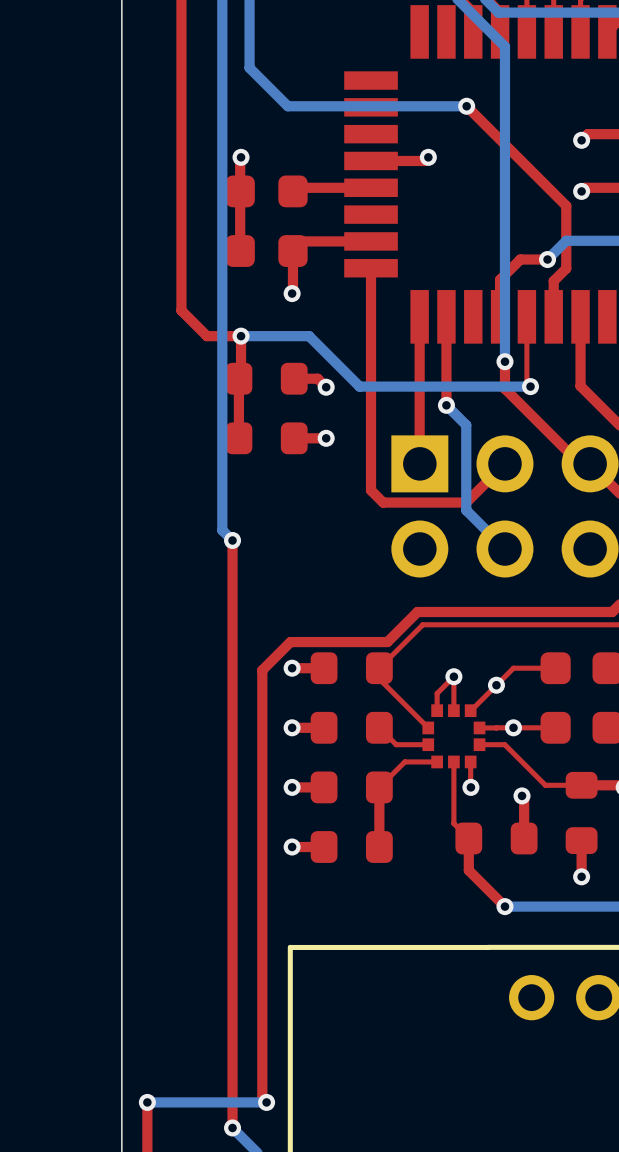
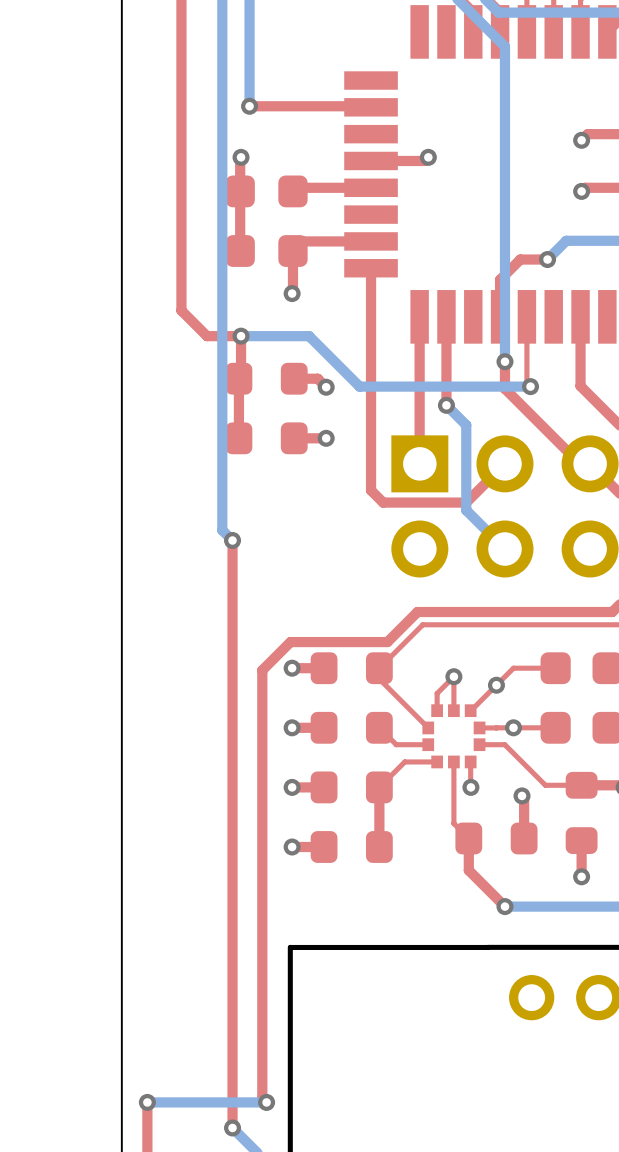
bottom track: (249, 67) (287, 106) (466, 106) -> (249, 67) (249, 106)
top track: none -> (249, 106) (371, 107)
via: none -> (249, 106)
top track: (466, 106) (566, 205) (566, 268) (553, 281) (553, 316) -> none
via: (466, 106) -> none

